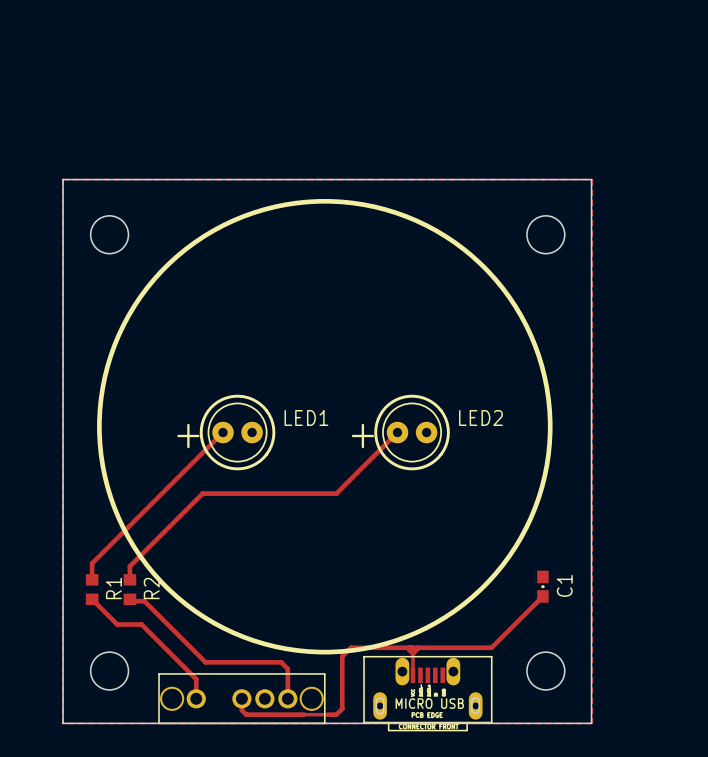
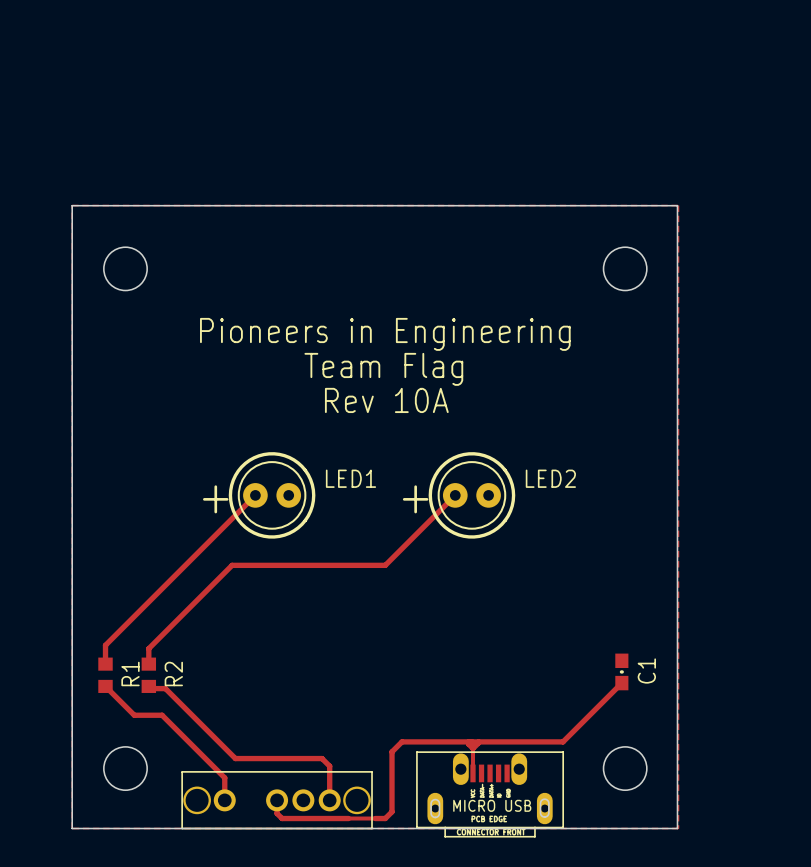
drawing: [97, 198, 553, 655] -> none
text: none -> Pioneers in Engineering (385, 334)
text: none -> Team Flag (383, 369)
text: none -> Rev 10A (386, 400)

